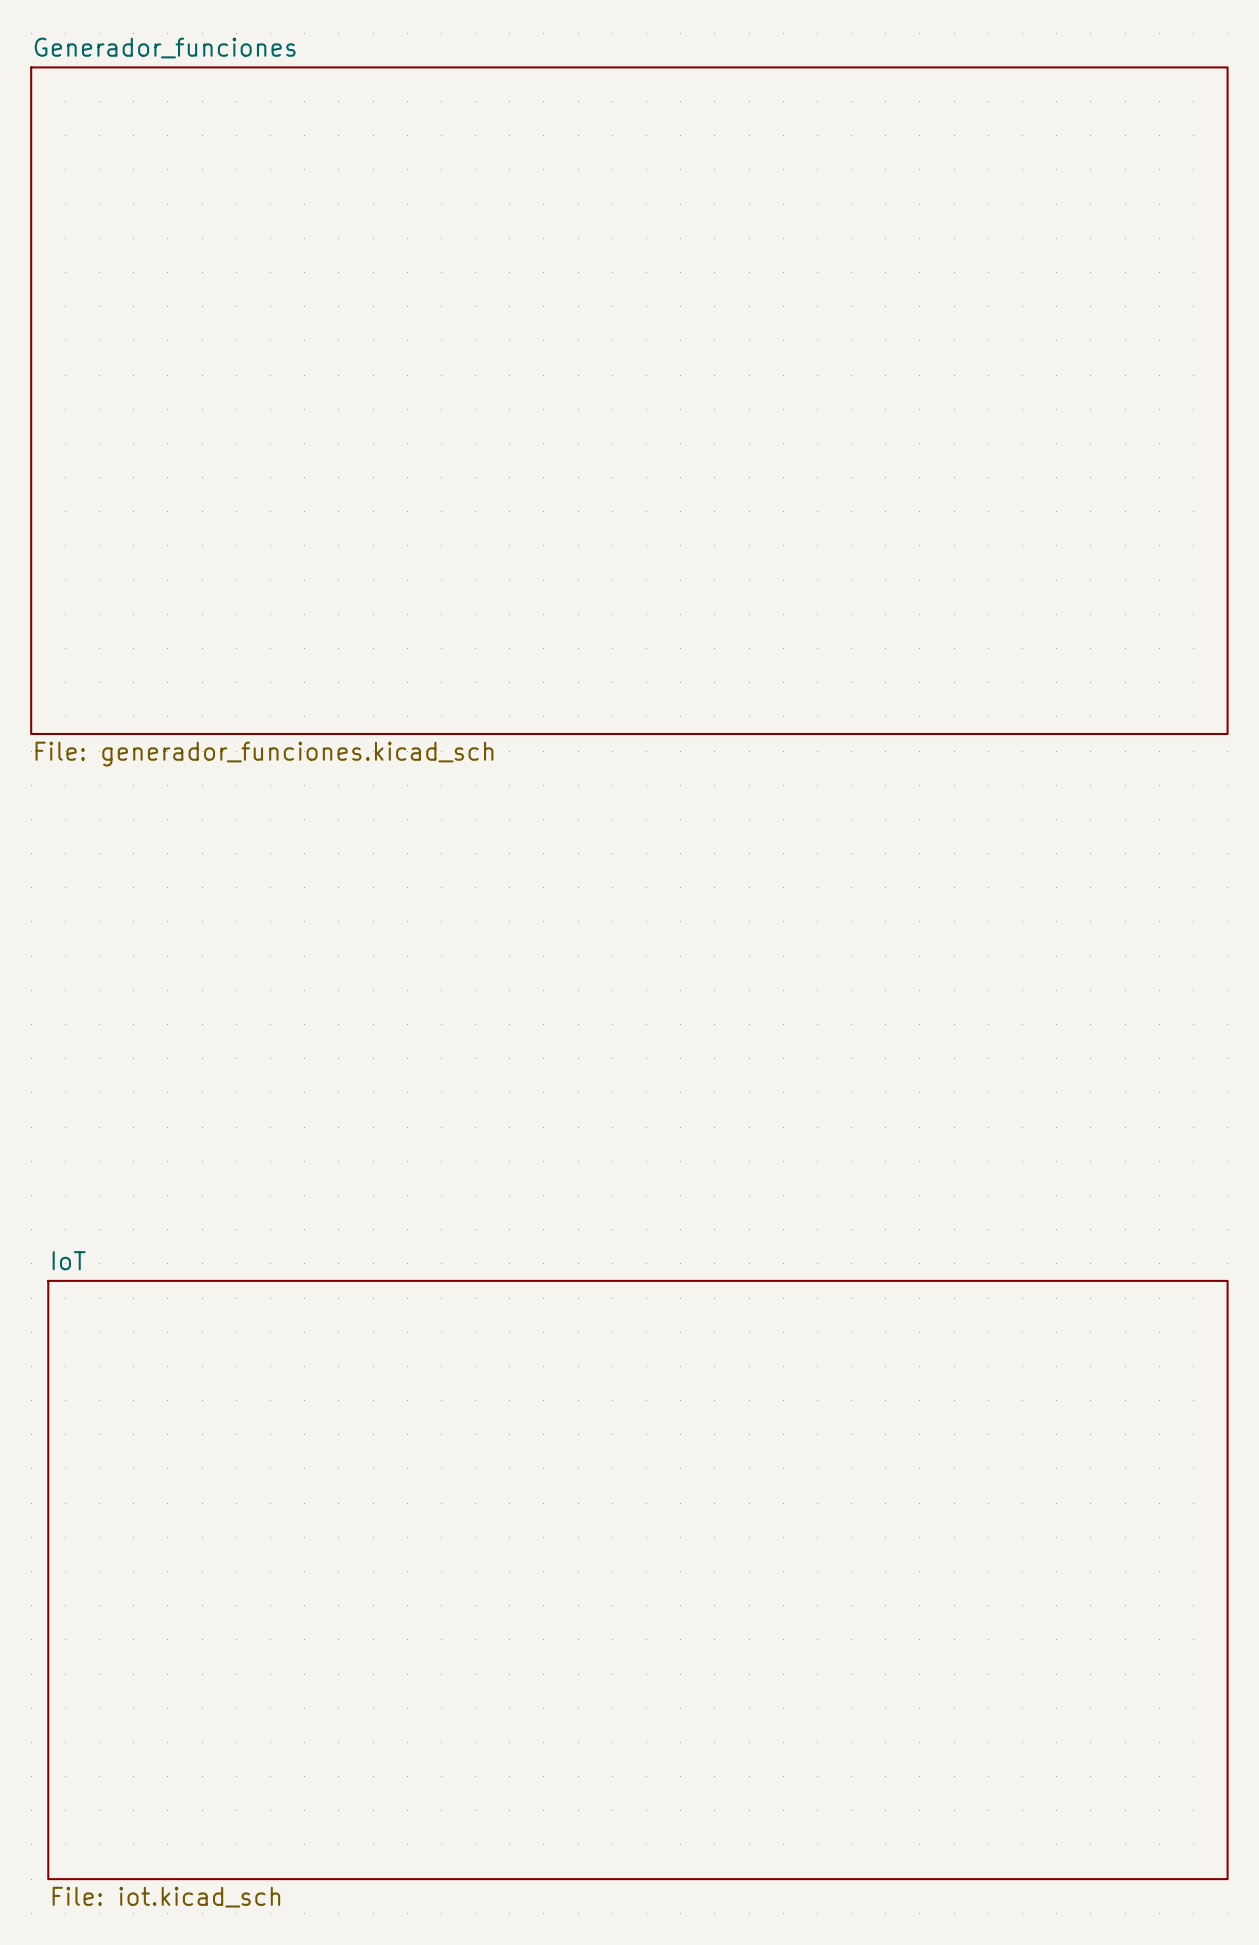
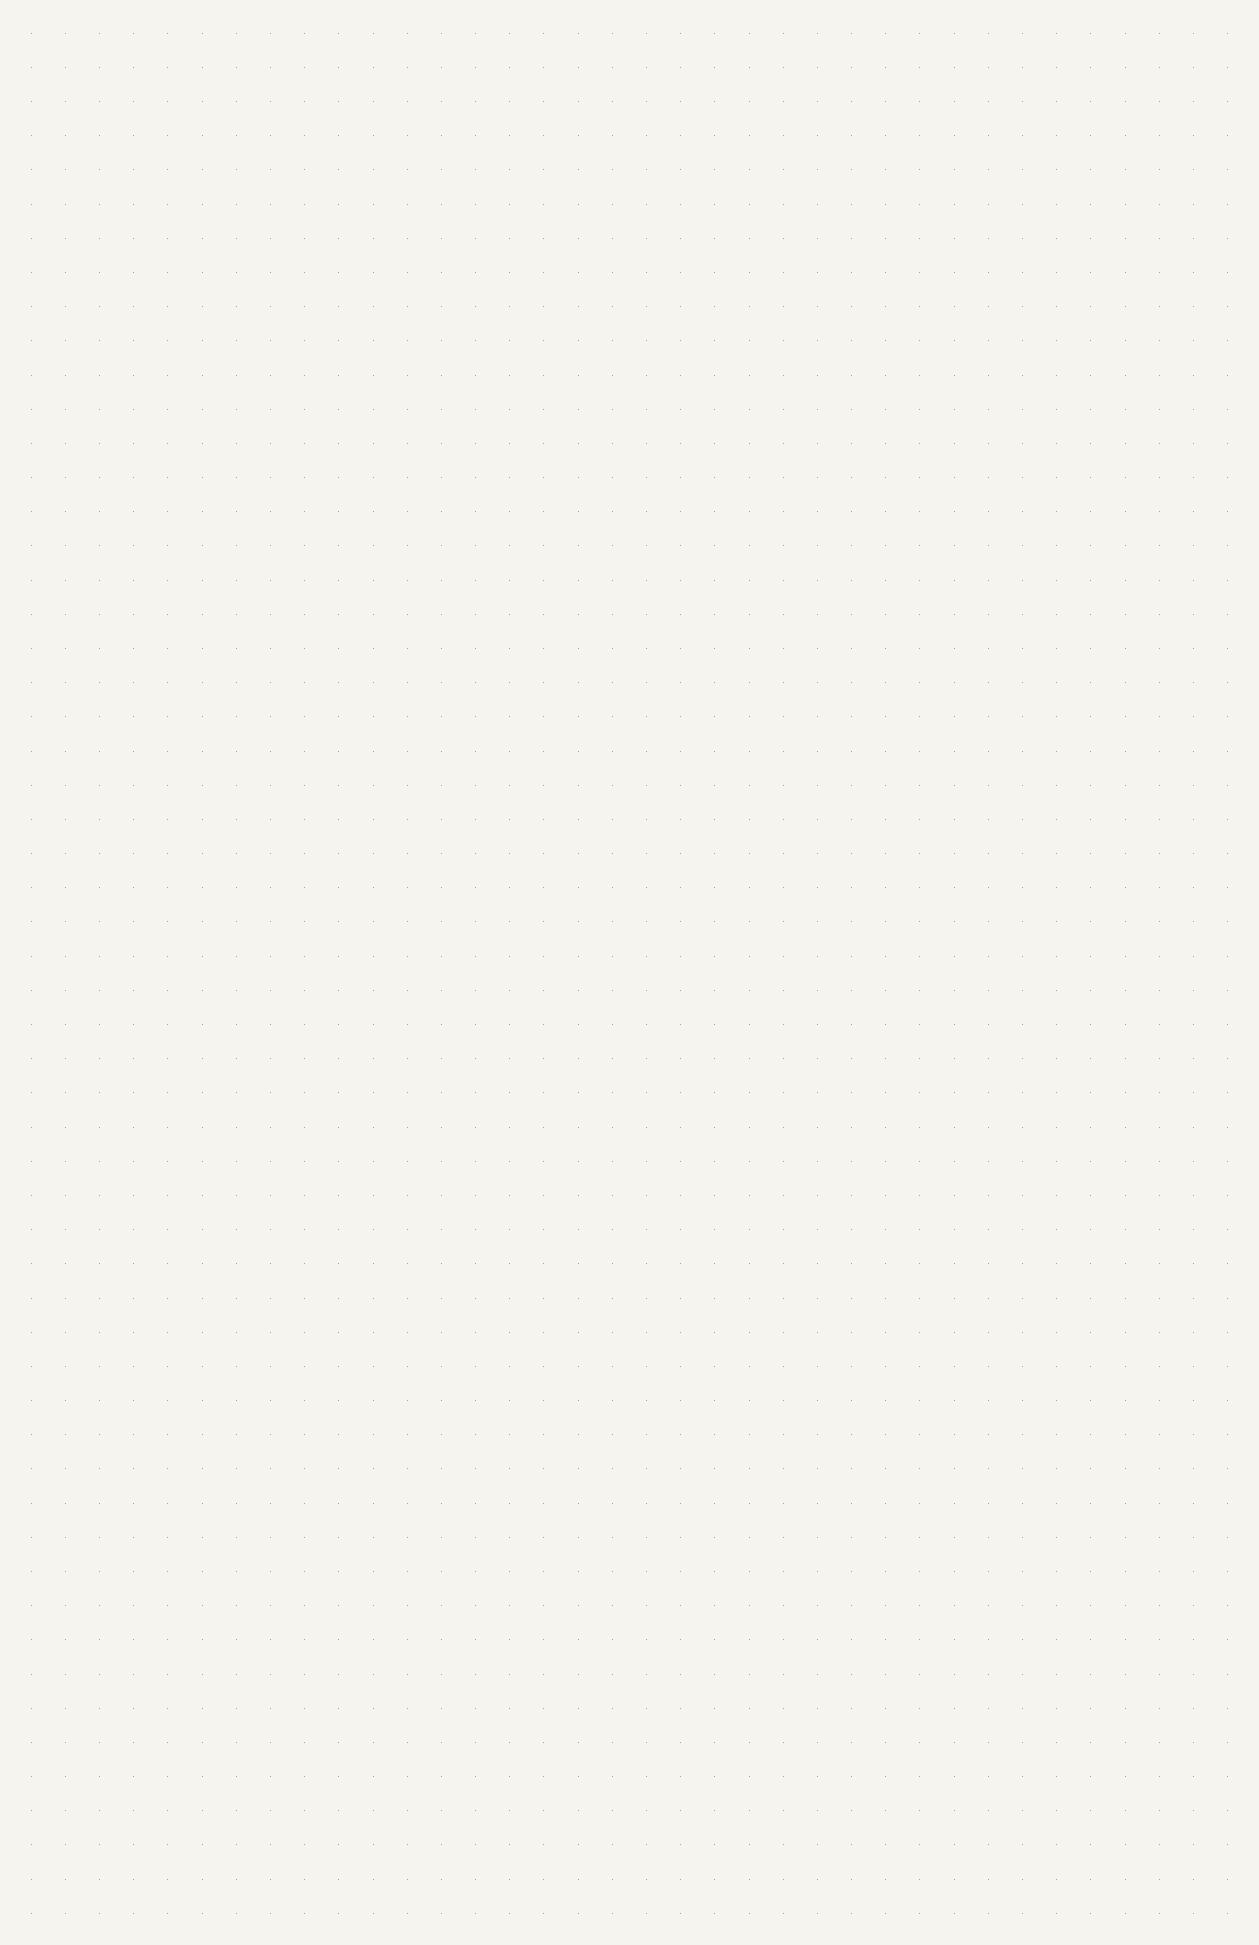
sheet Generador_funciones: File: generador_funciones.kicad_sch (629, 400) -> none
sheet IoT: File: iot.kicad_sch (637, 1580) -> none

